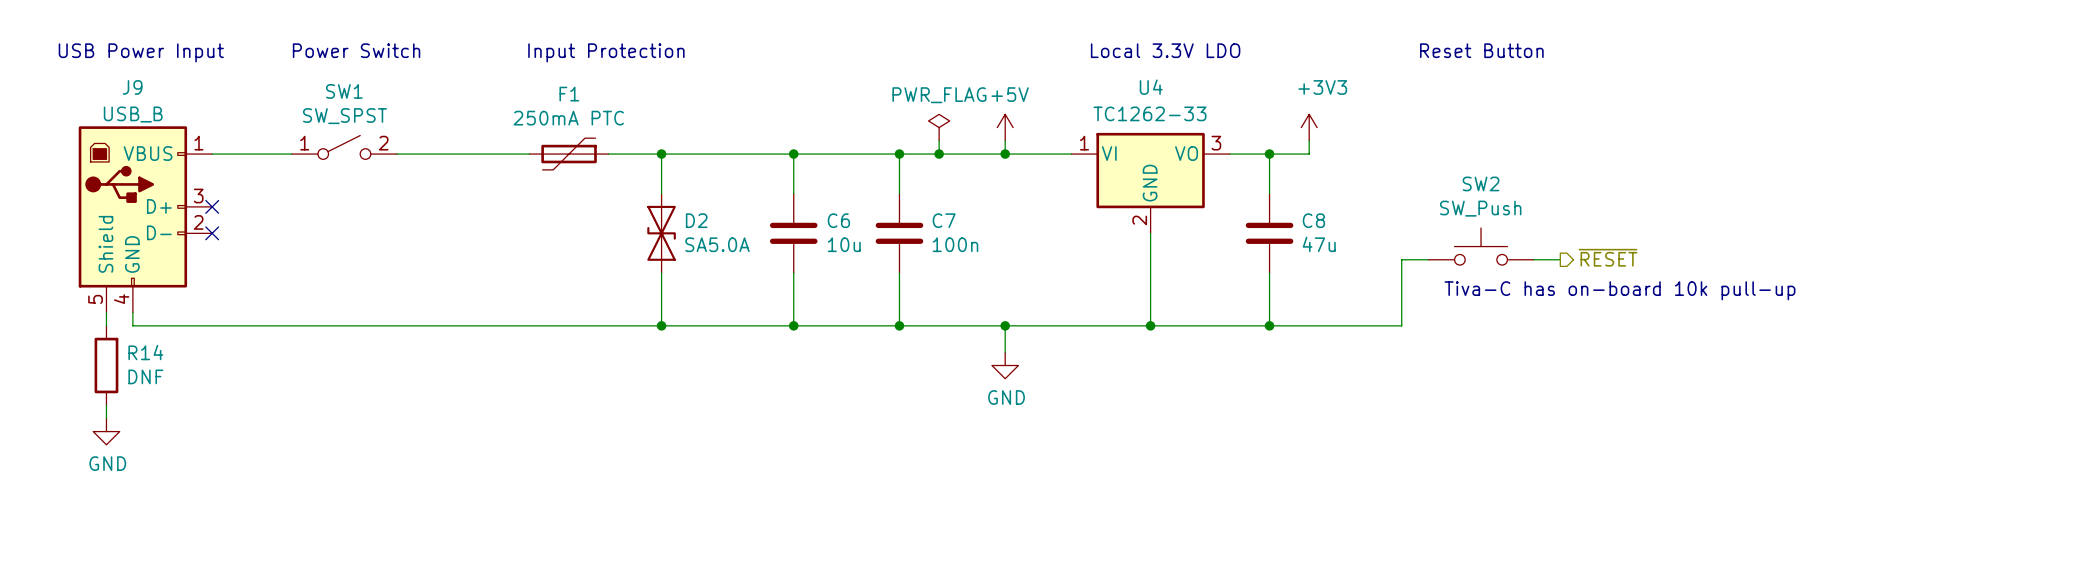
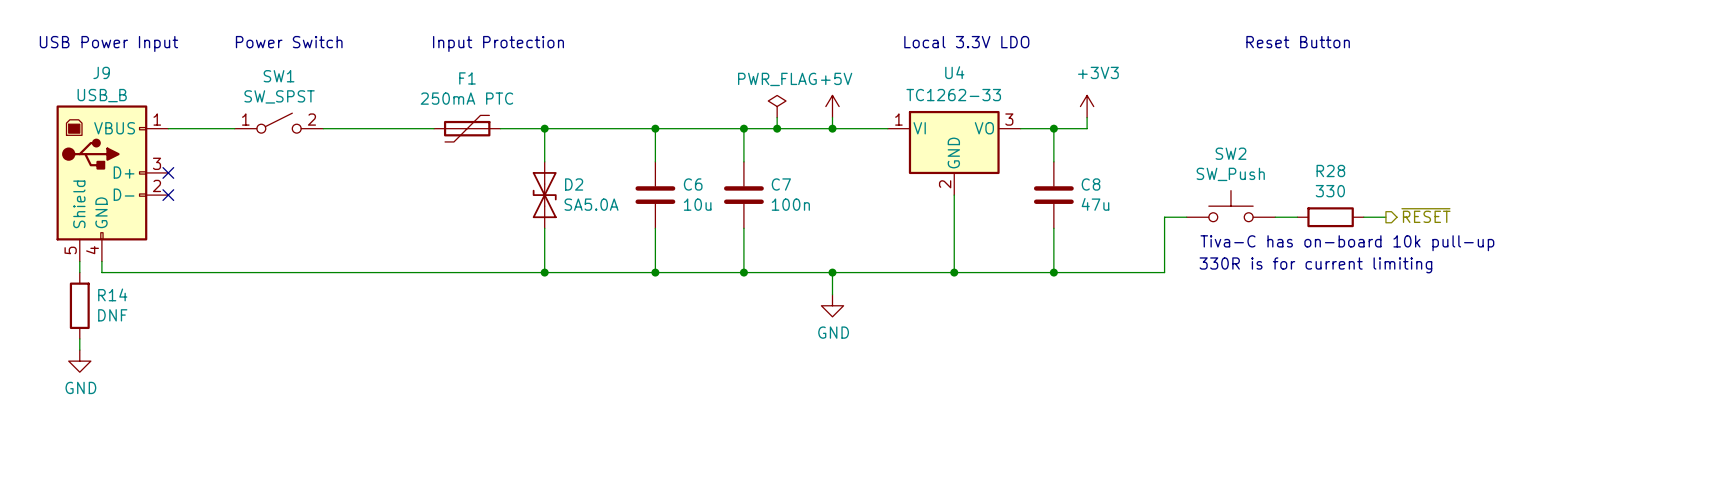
text position: Reset Button (1481, 50) -> Reset Button (1298, 42)
hierarchical label position: ~{RESET} (1608, 257) -> ~{RESET} (1425, 215)
R28: none -> 330 (1330, 217)
wire: none -> (1363, 217) (1385, 217)
text: none -> 330R is for current limiting (1315, 265)

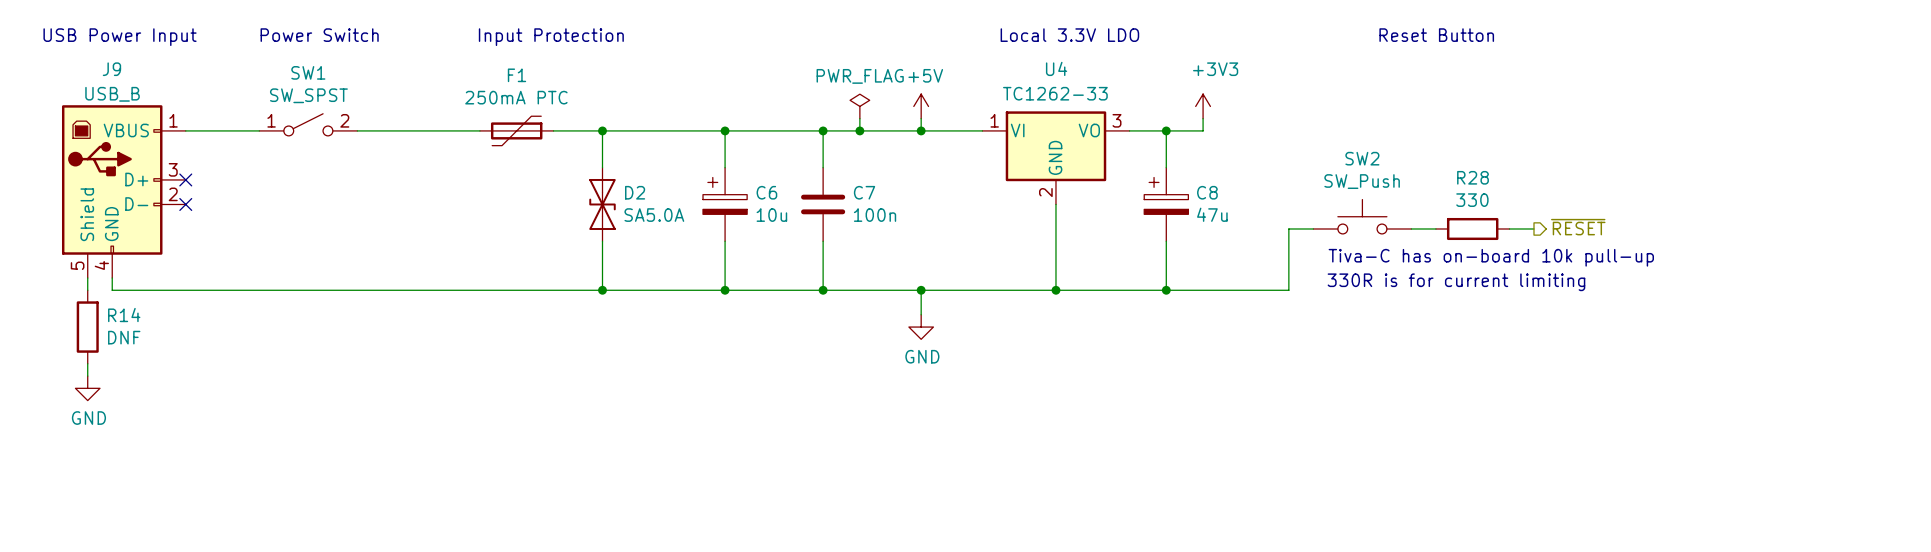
C6 symbol: [635, 161, 676, 229] -> [703, 167, 748, 242]
C8 symbol: [1033, 161, 1074, 229] -> [1144, 167, 1189, 242]

